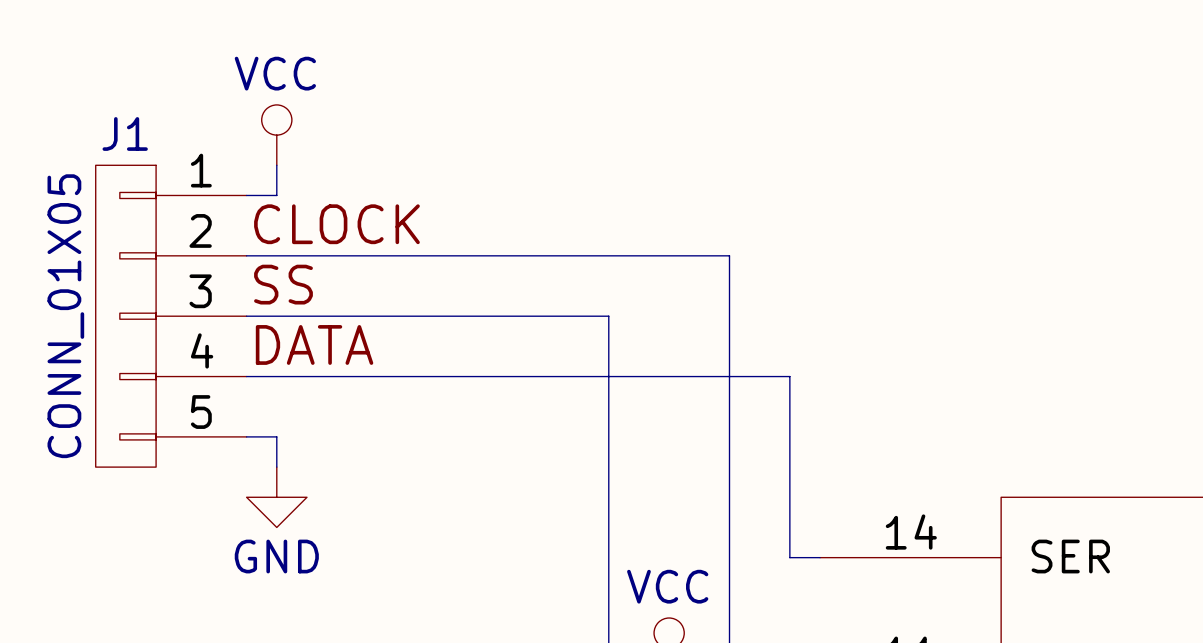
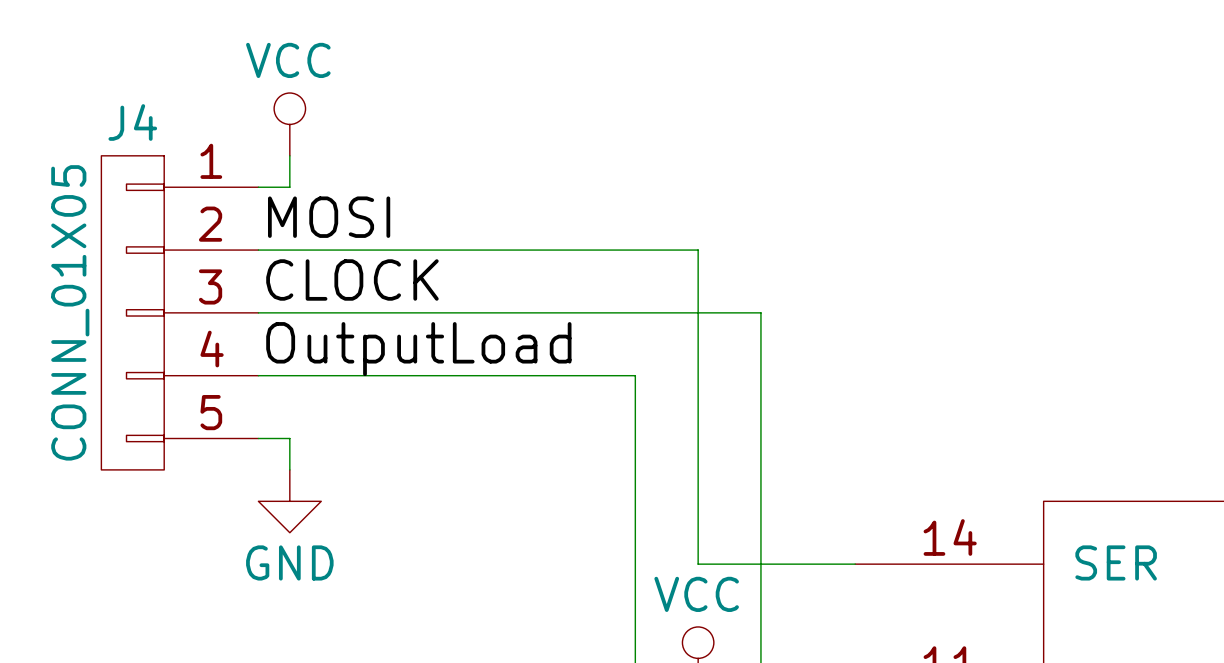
J1 name: J1 (125, 133) -> J4 (132, 122)
label: CLOCK (336, 224) -> MOSI (329, 217)
wire: (669, 255) (729, 255) (729, 316) -> (635, 312) (760, 312)
label: SS (283, 284) -> CLOCK (352, 279)
wire: (608, 316) (608, 376) (789, 376) (789, 557) -> (698, 250) (698, 564) (823, 564)
label: DATA (314, 344) -> OutputLoad (418, 349)

